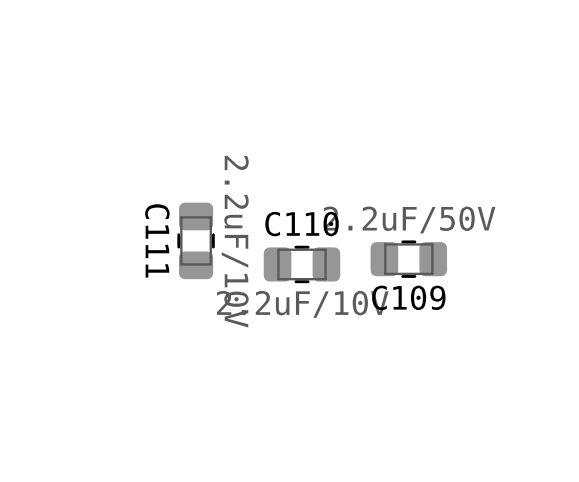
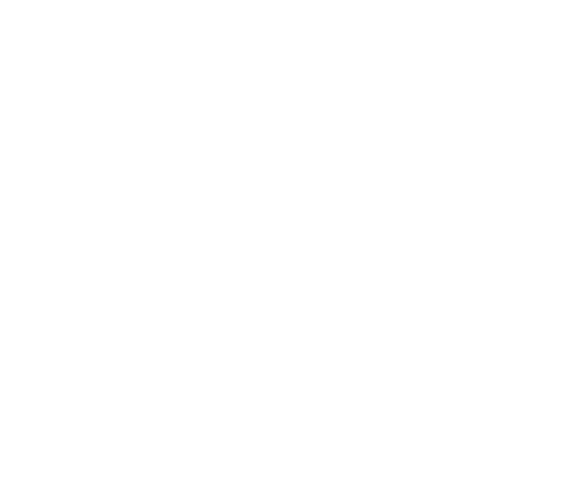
C111: 2.2uF/10V (196, 240) -> none
C109: 2.2uF/50V (408, 259) -> none
C110: 2.2uF/10V (302, 264) -> none

